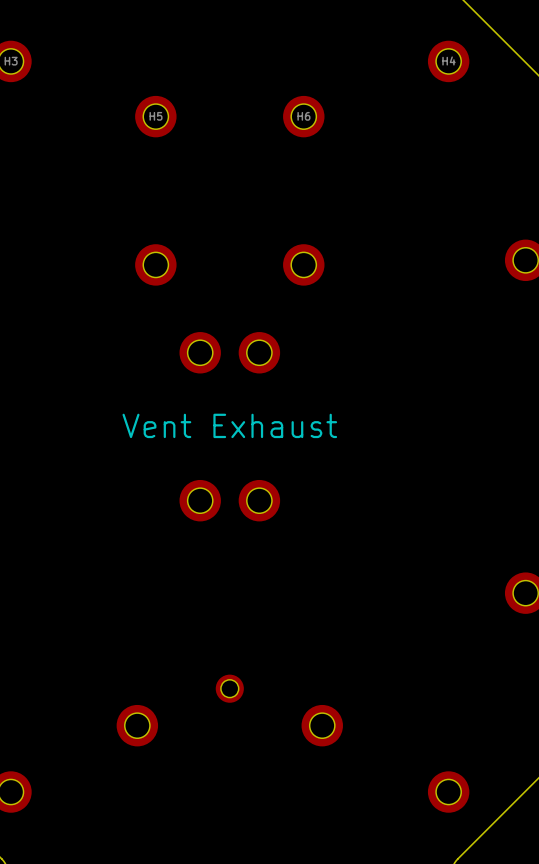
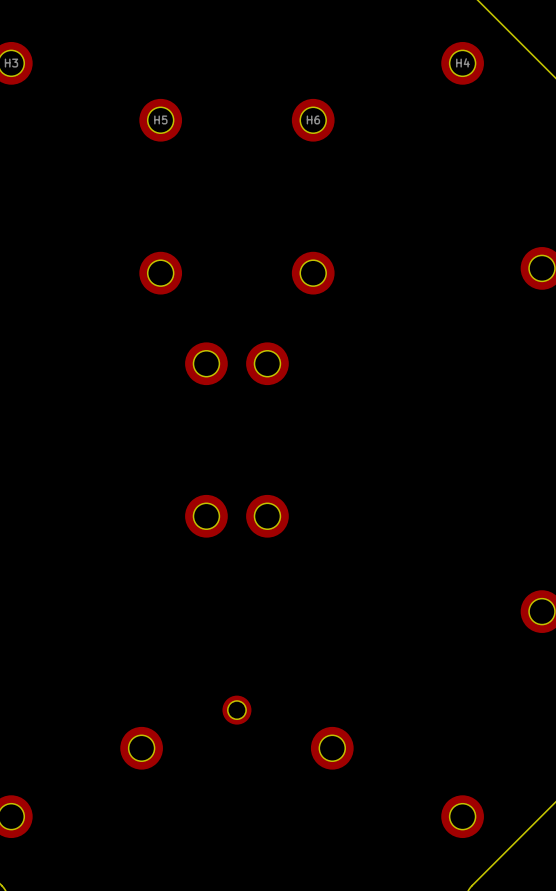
text: Vent Exhaust (229, 425) -> none

